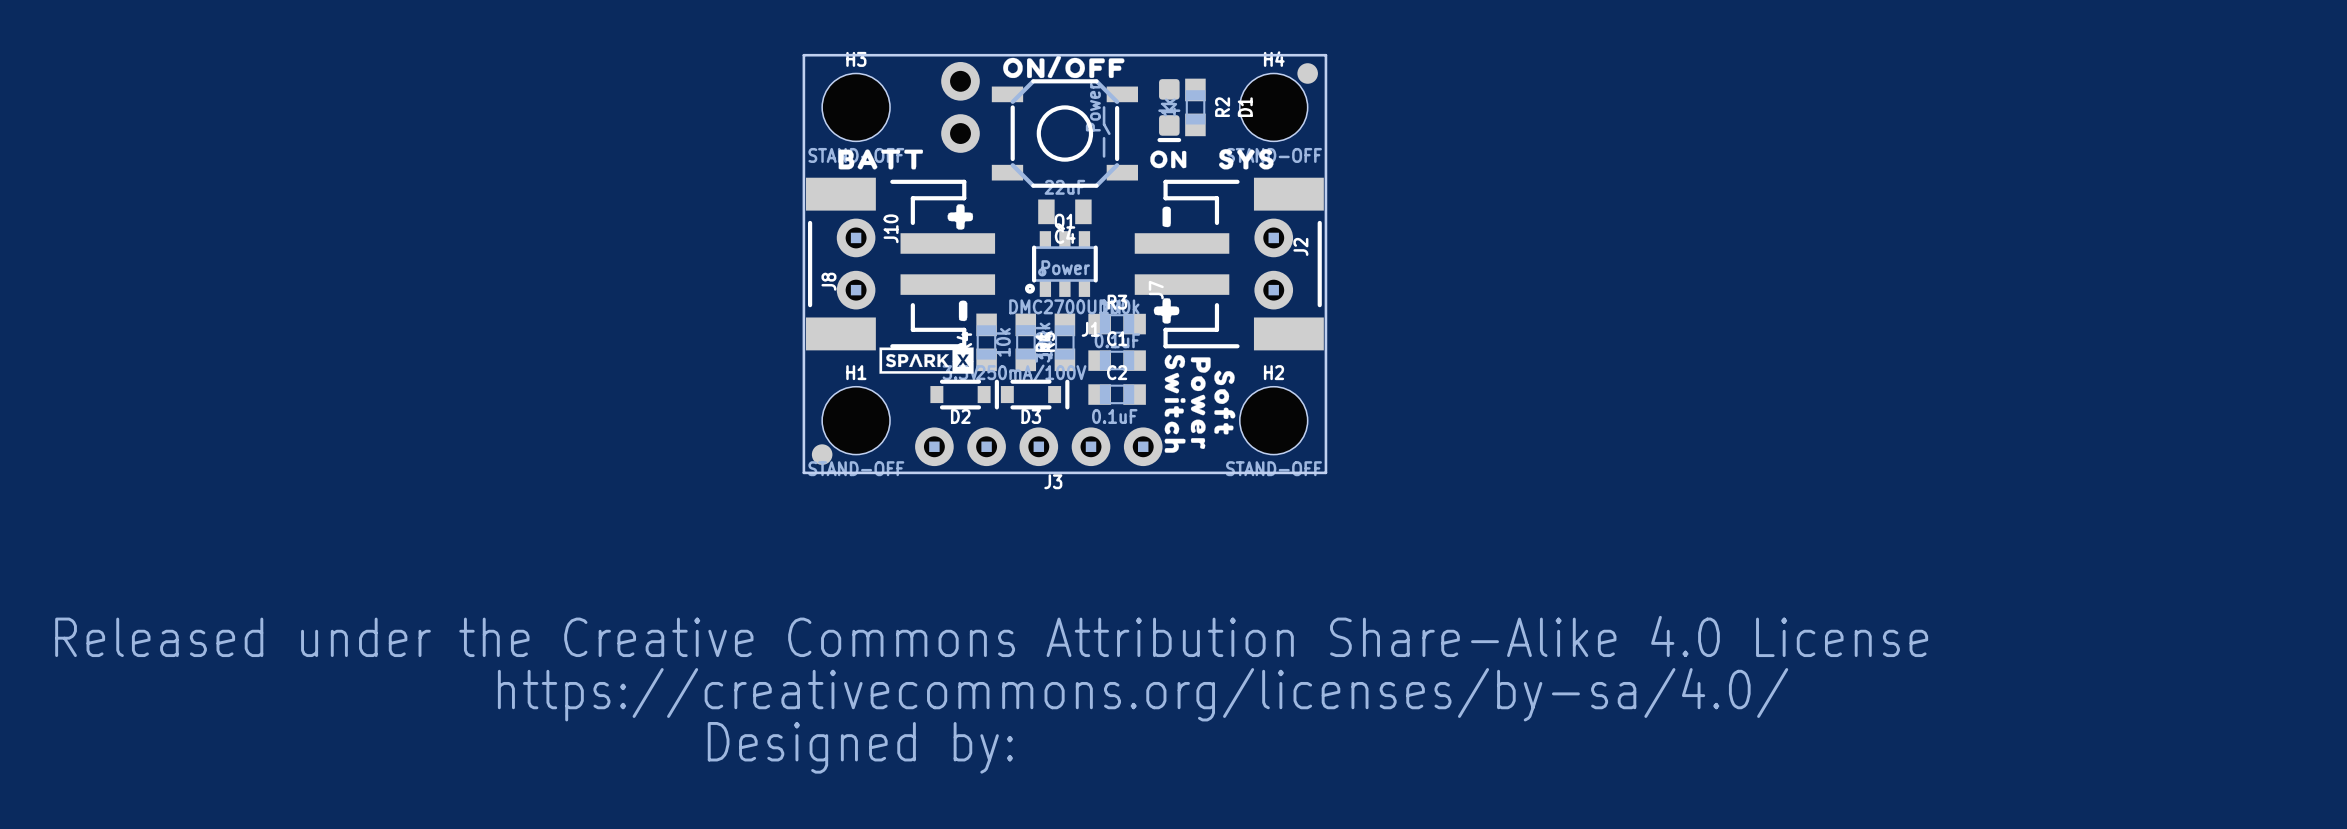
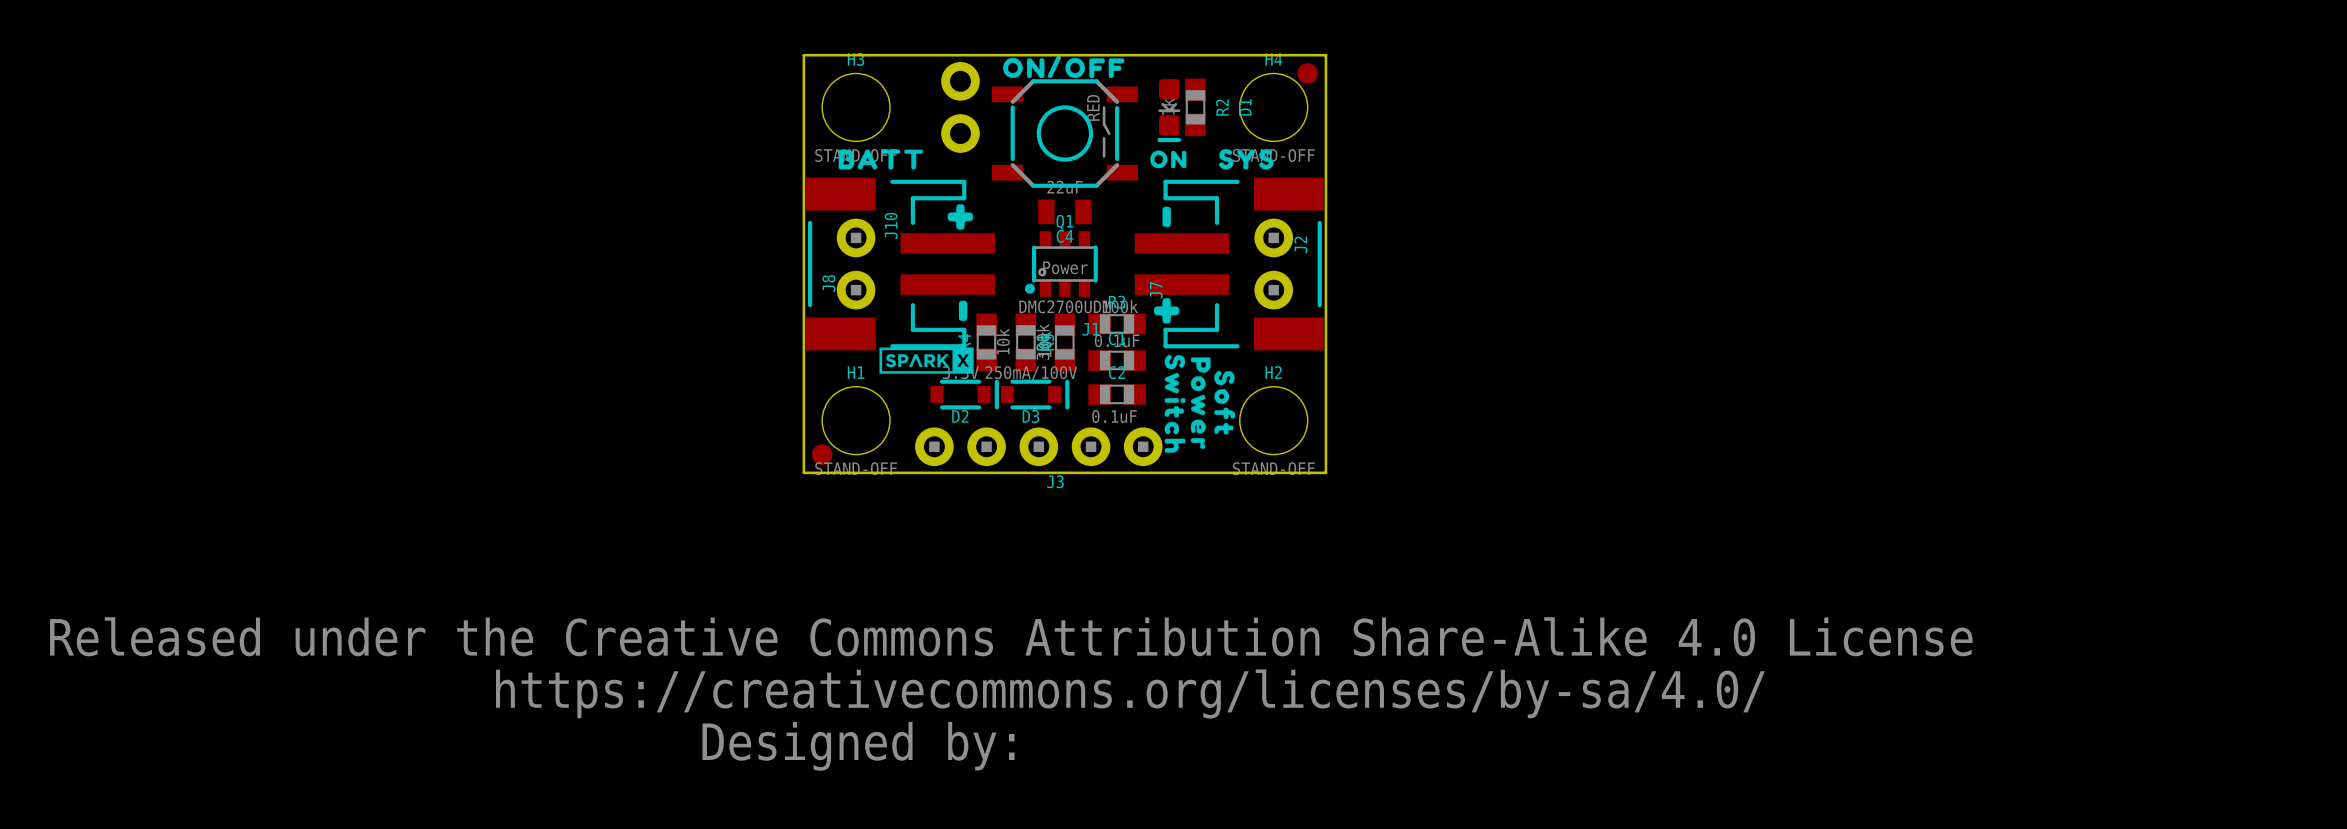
D1 value: Power (1093, 107) -> RED (1093, 107)

